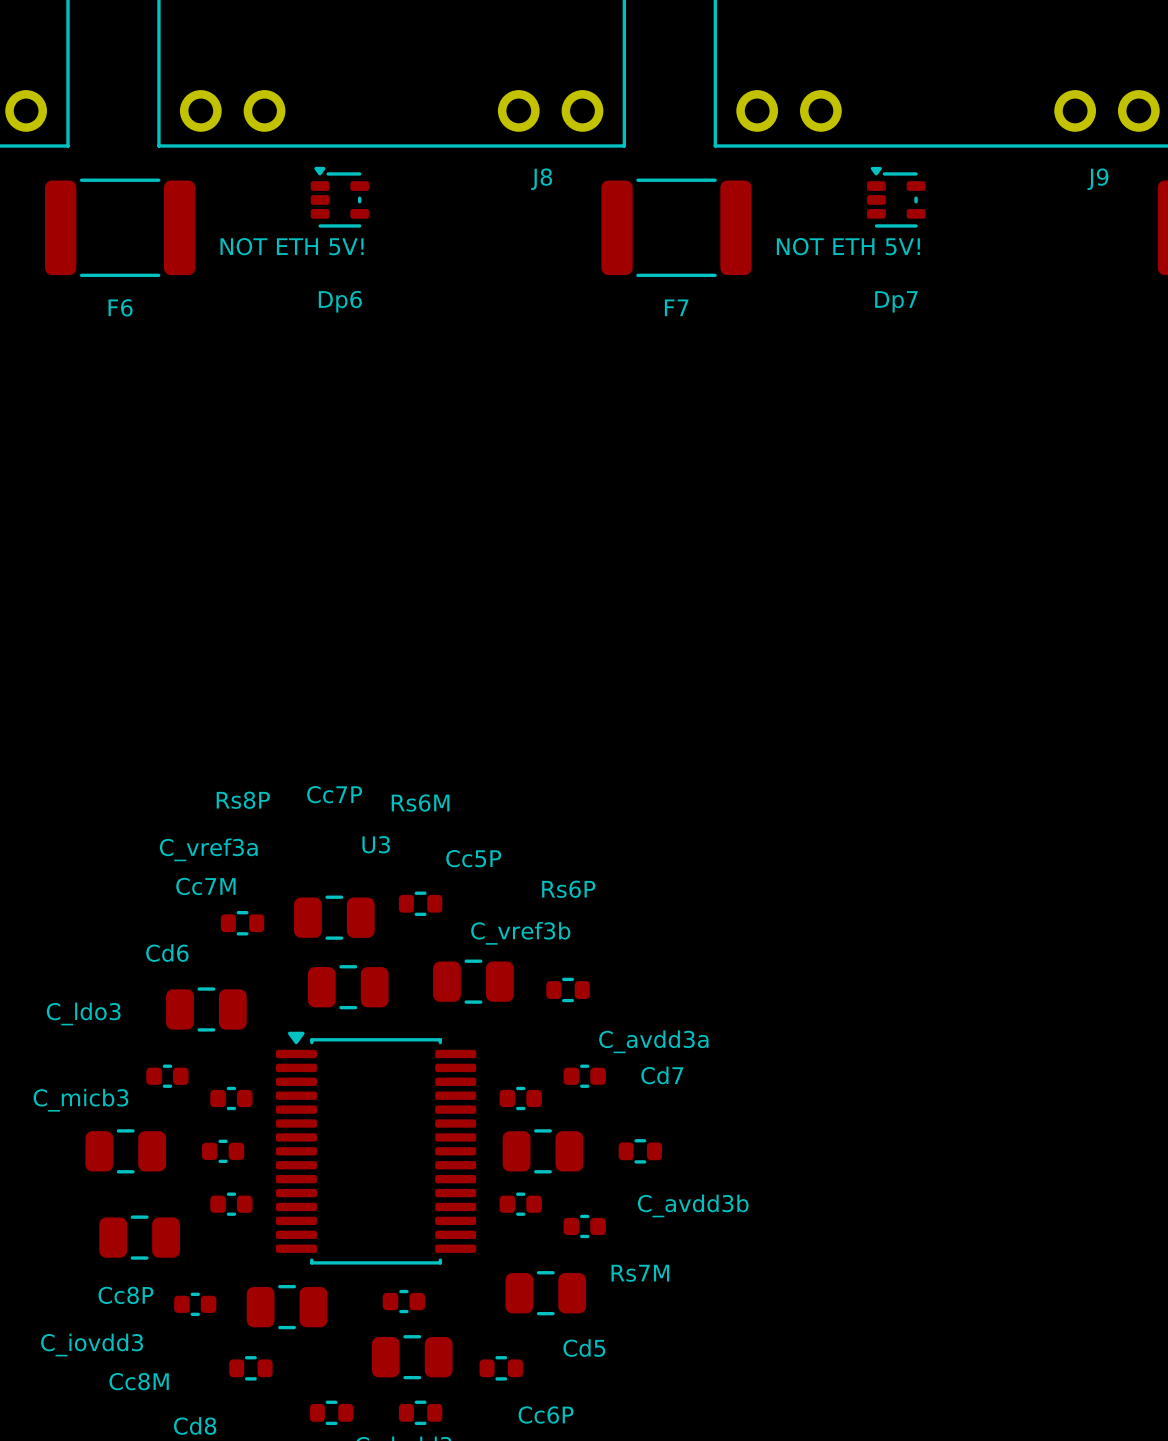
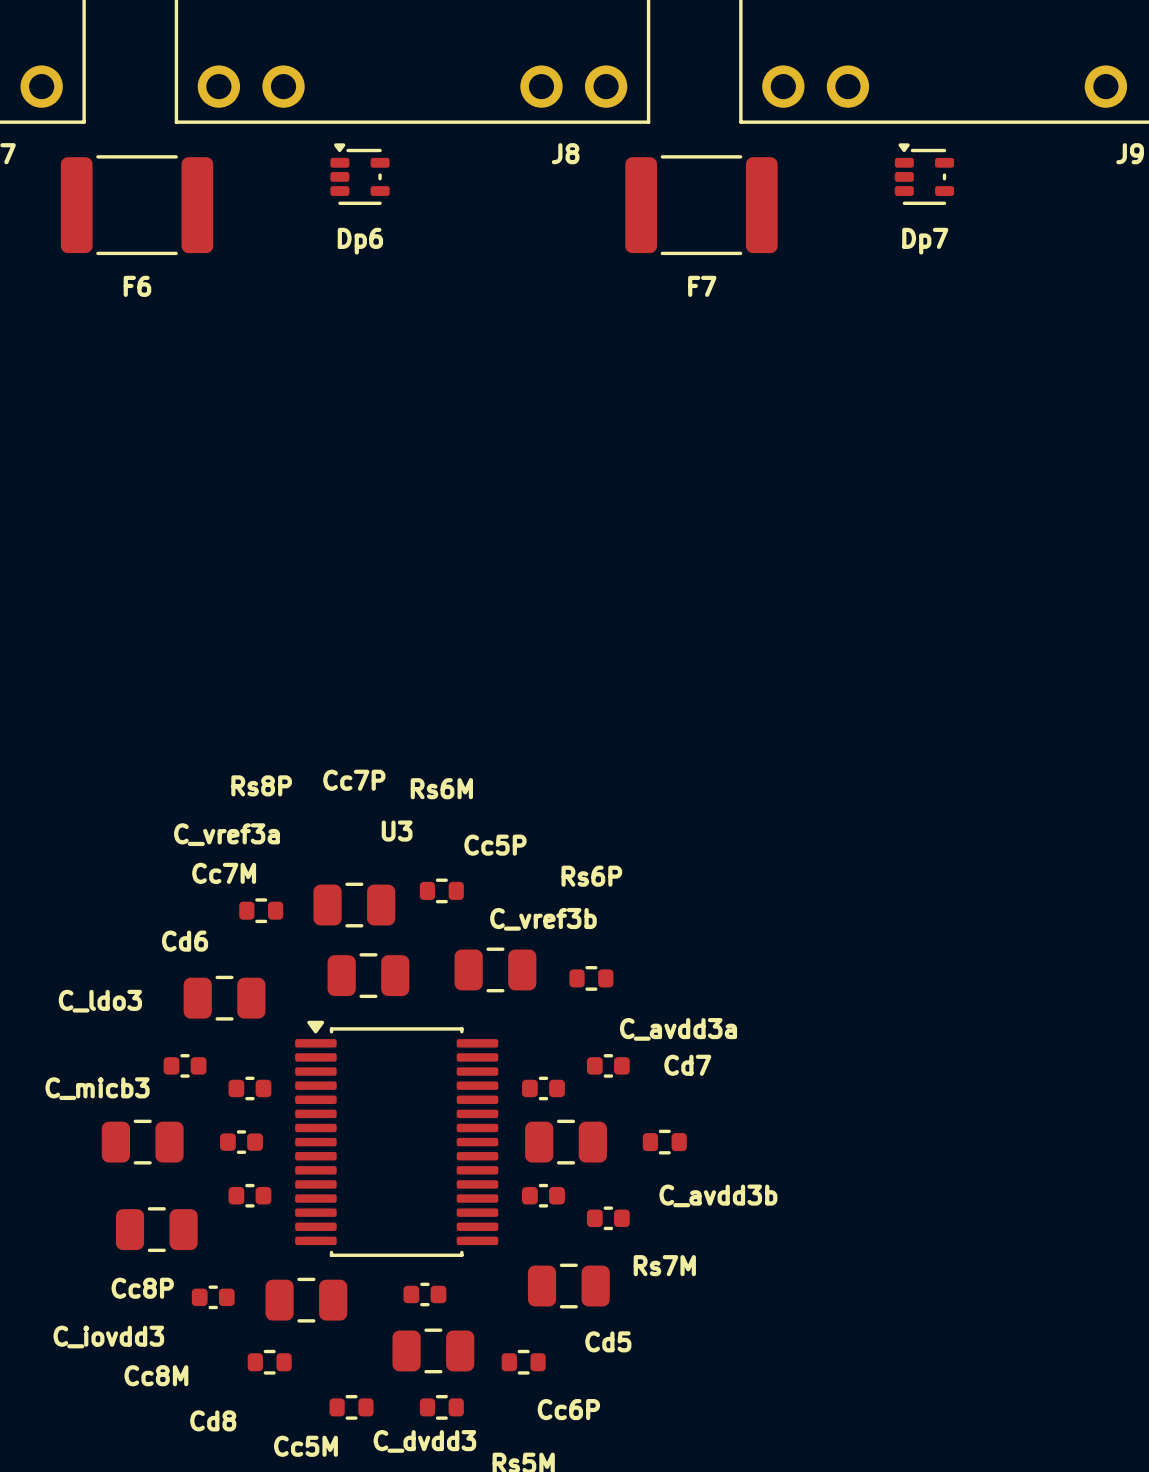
text: NOT ETH 5V! (292, 246) -> none
text: NOT ETH 5V! (848, 246) -> none
Dp6 name position: Dp6 (340, 301) -> Dp6 (360, 241)
Dp7 name position: Dp7 (896, 301) -> Dp7 (925, 241)

